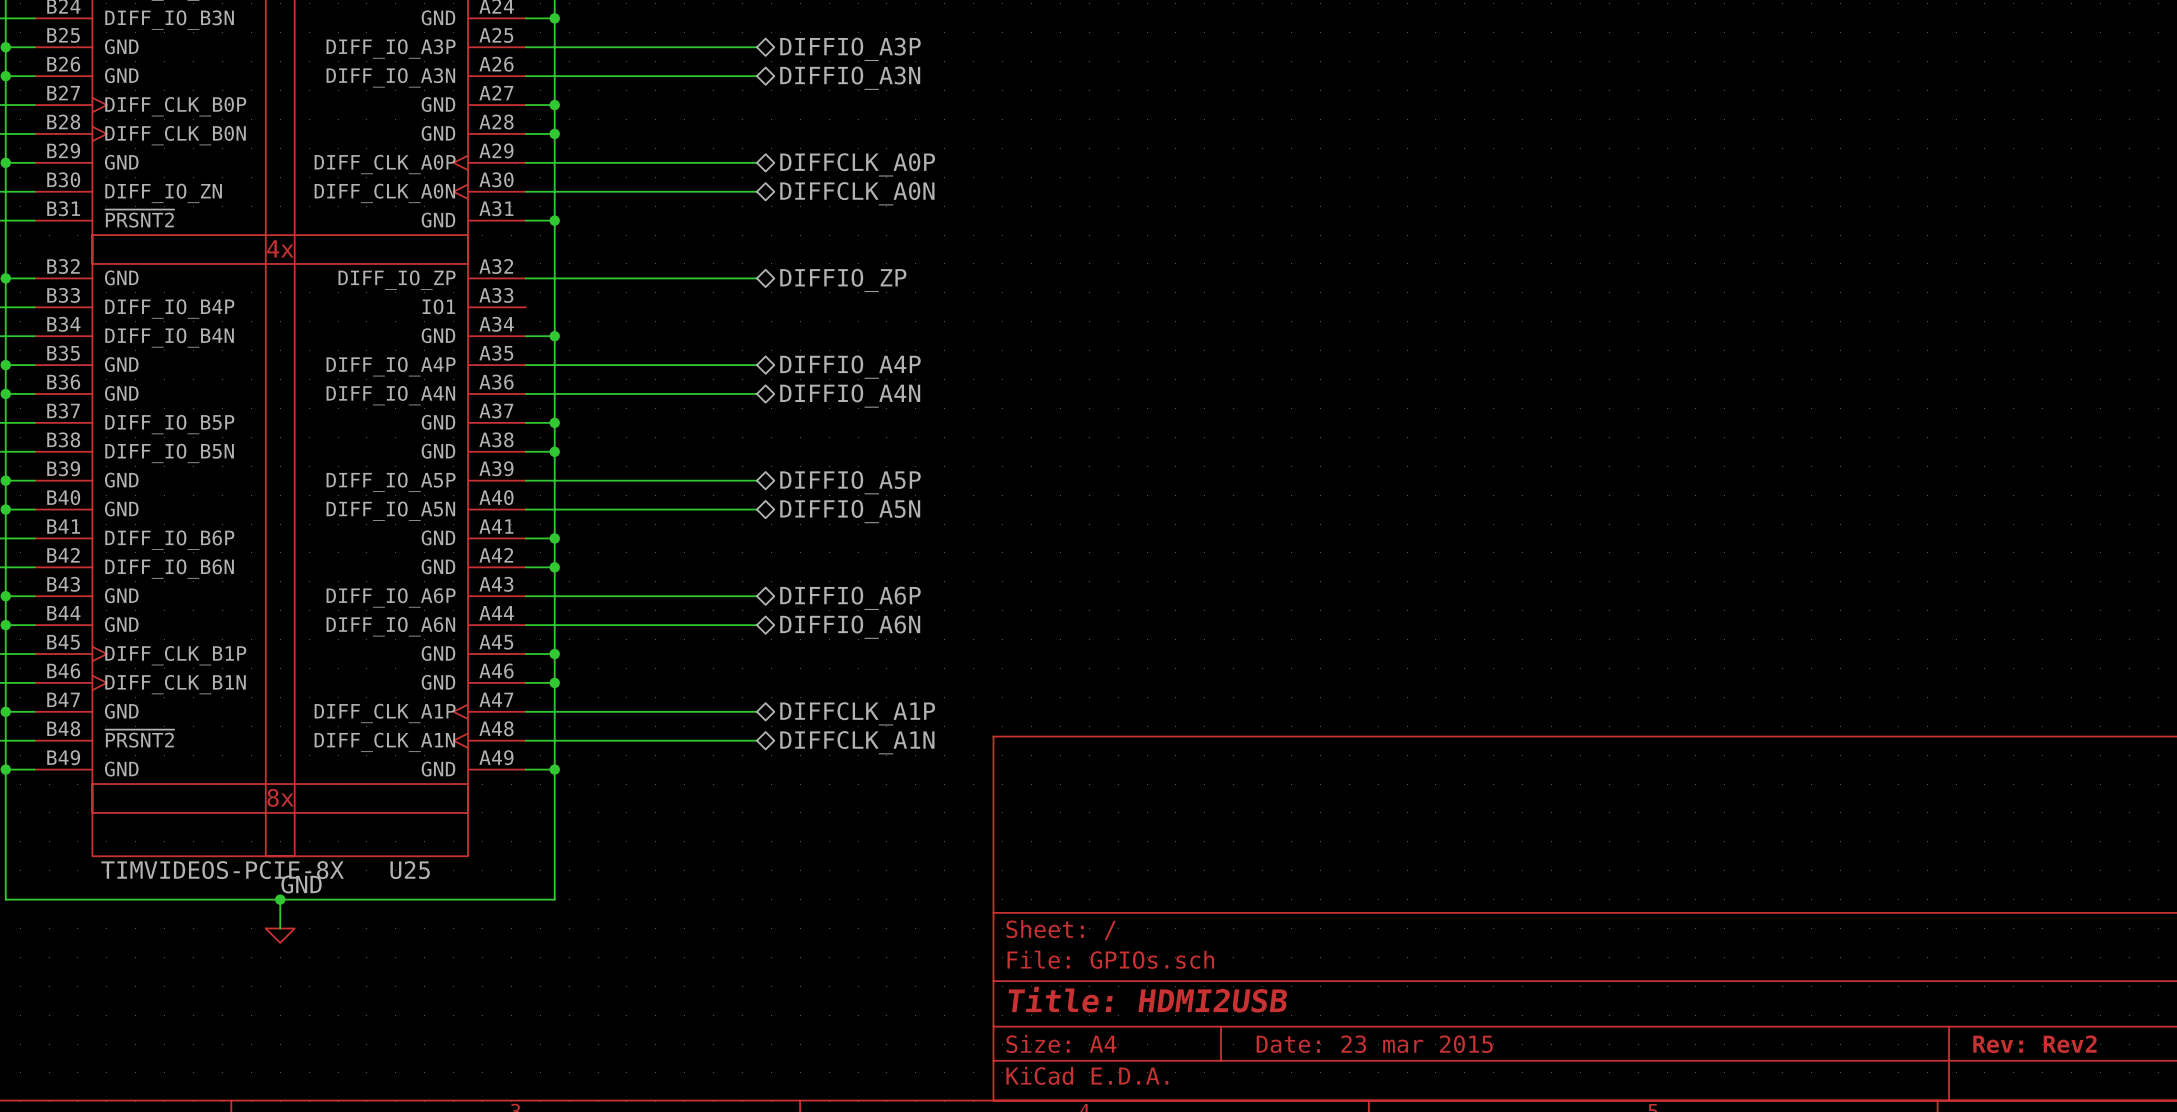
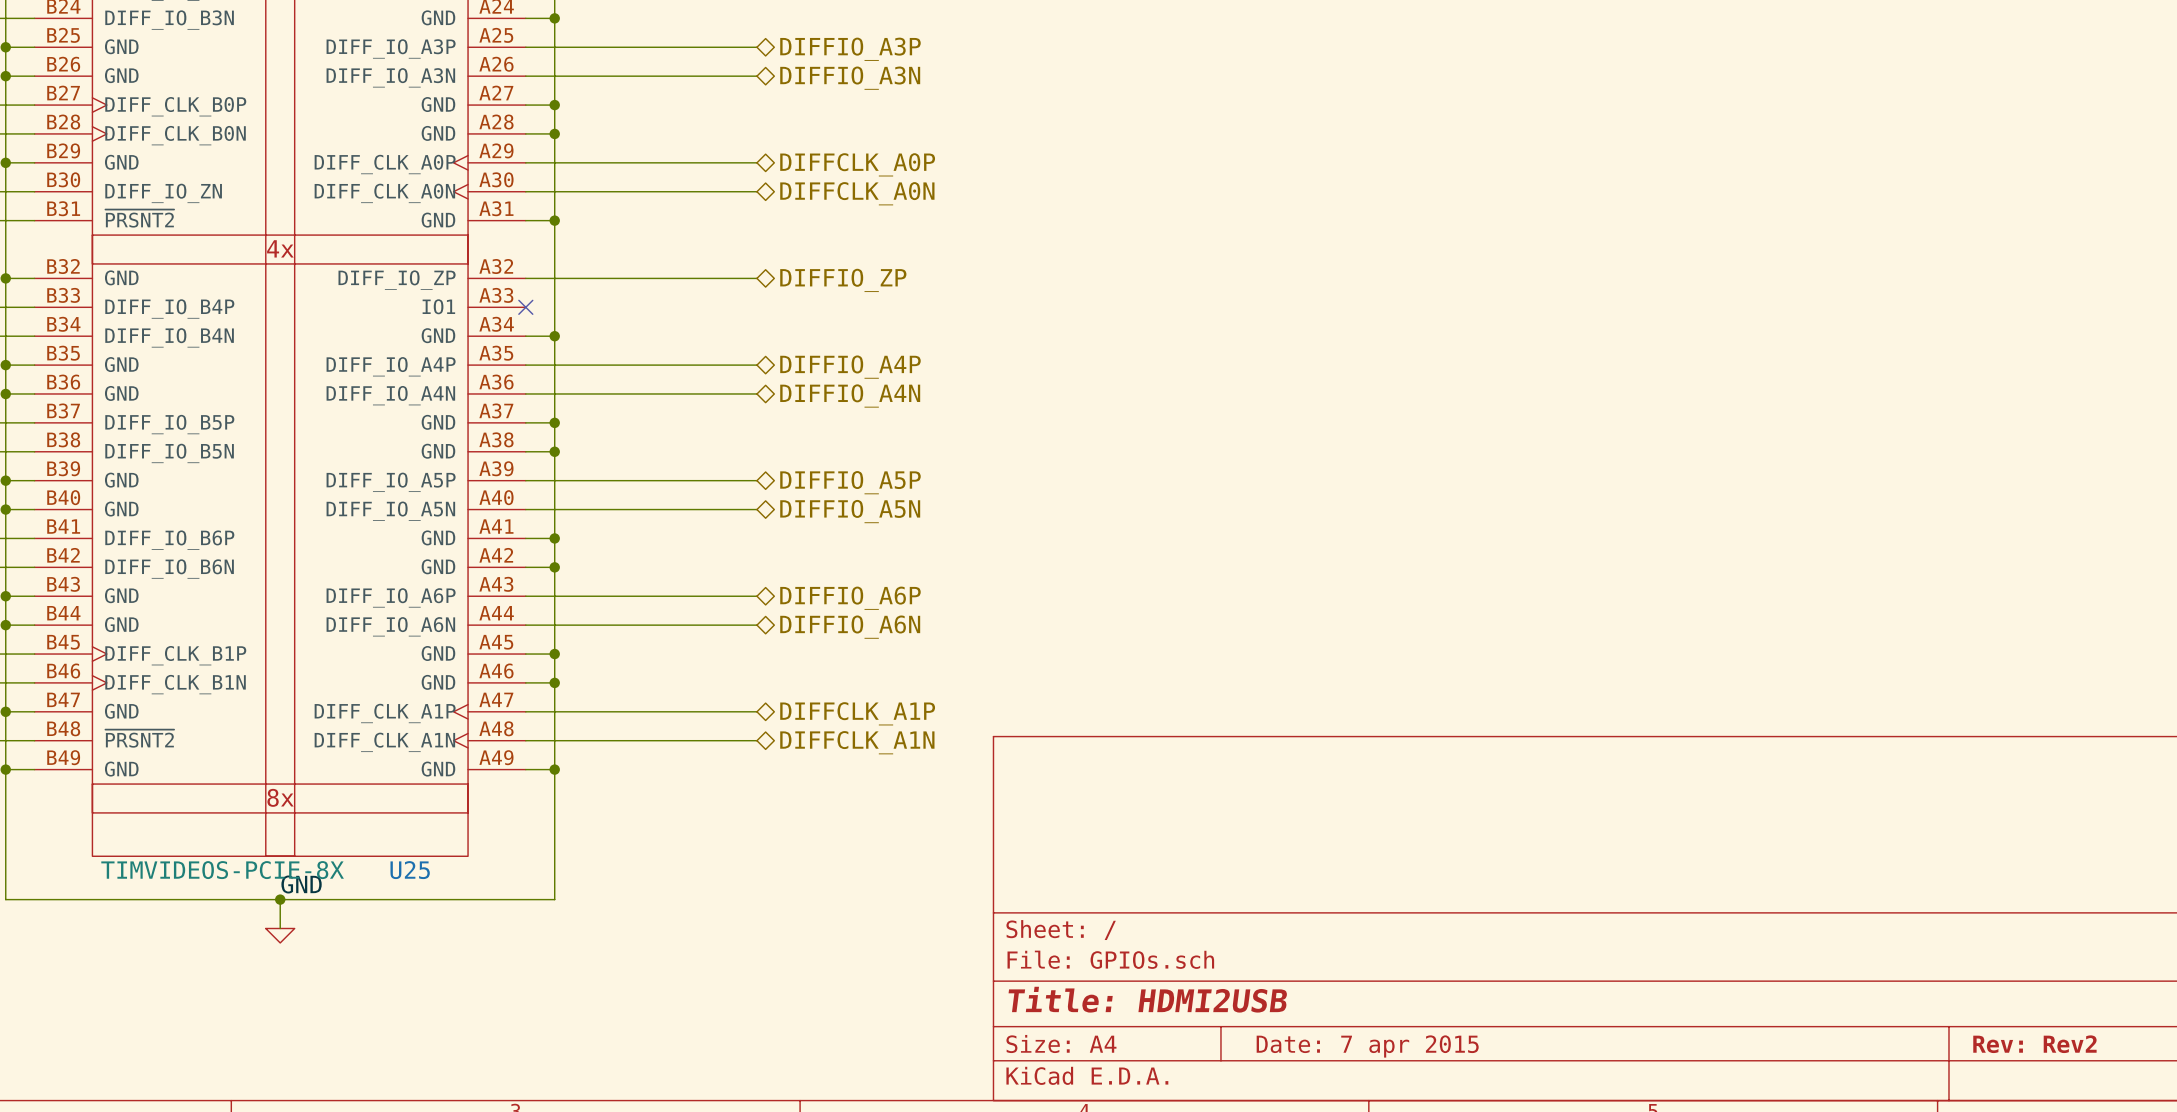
no-connect mark: none -> (525, 307)
title block: Date: 23 mar 2015 (1374, 1044) -> Date: 7 apr 2015 (1367, 1046)

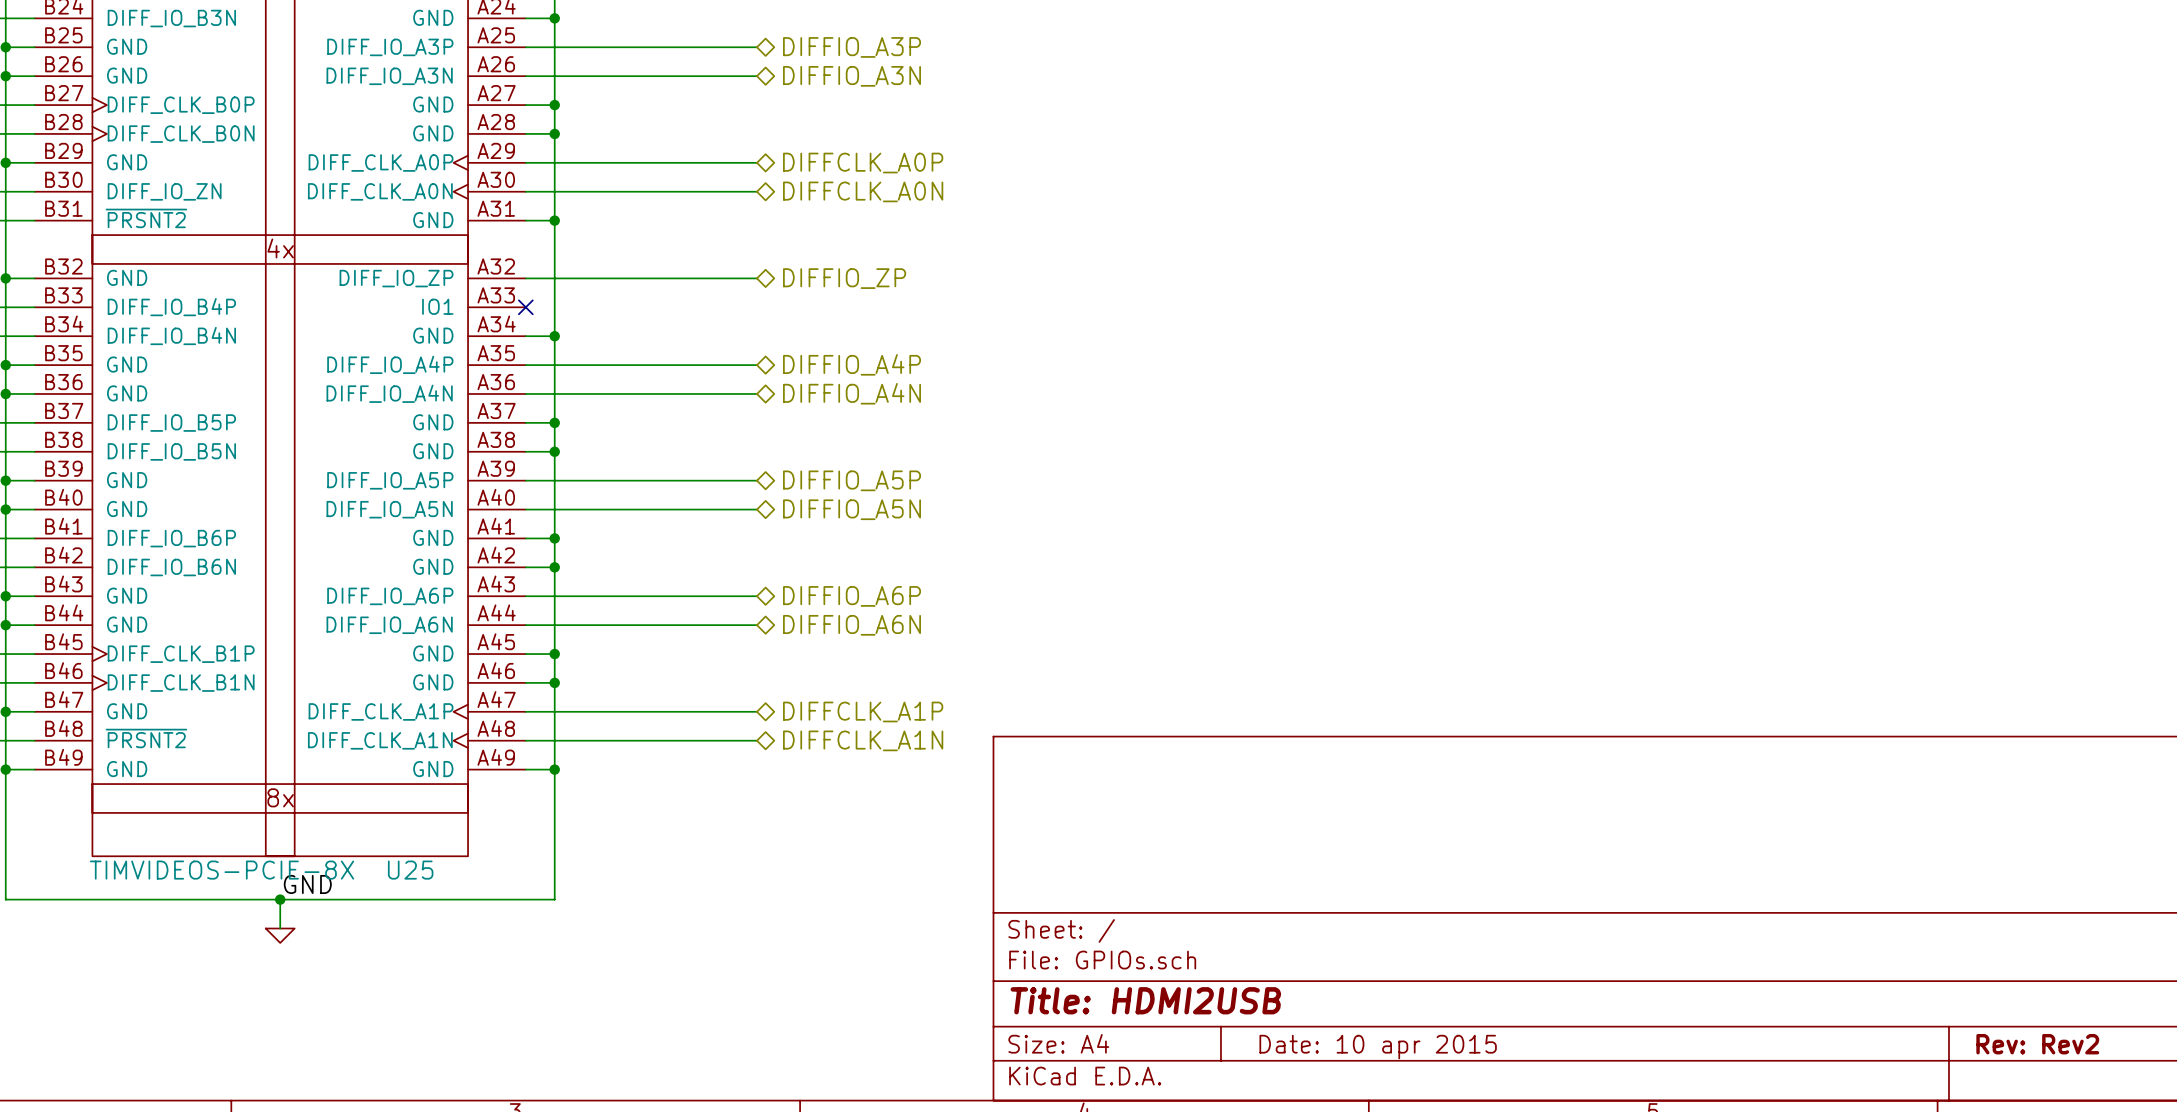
title block: Date: 7 apr 2015 (1367, 1046) -> Date: 10 apr 2015 (1378, 1047)

